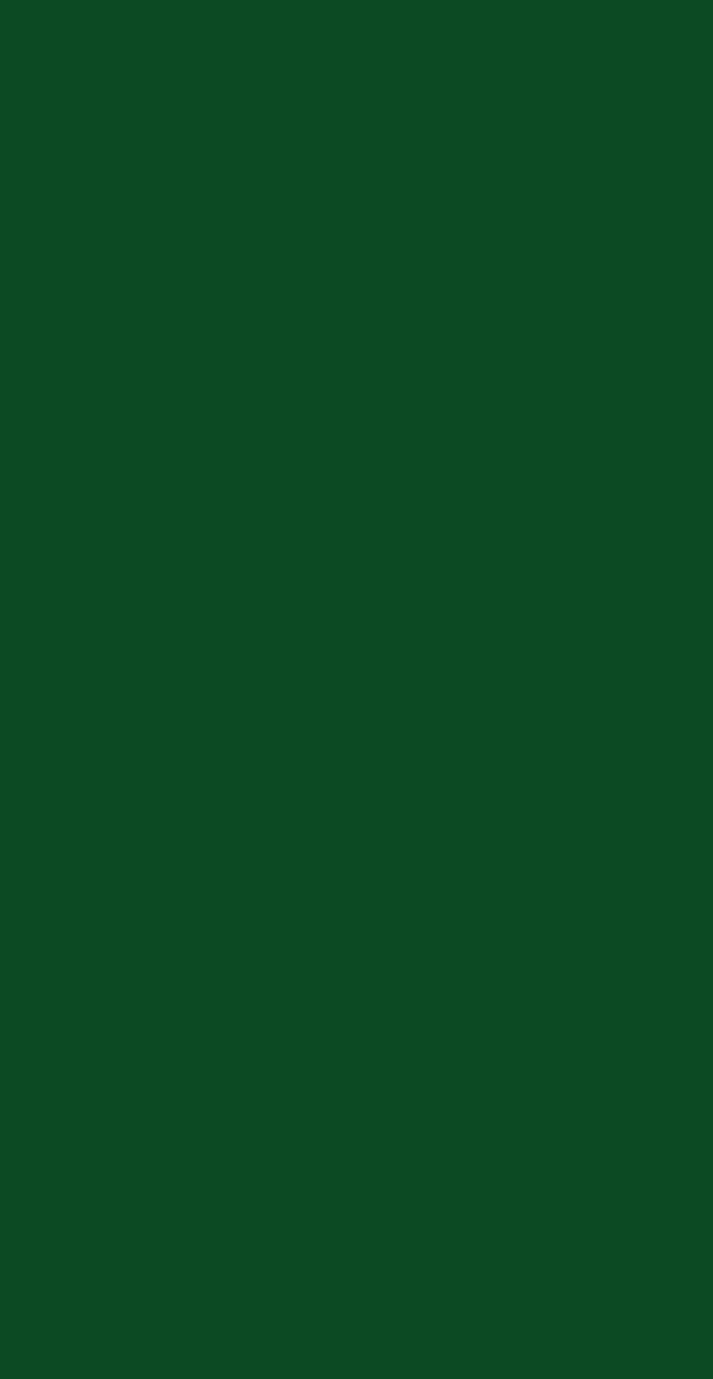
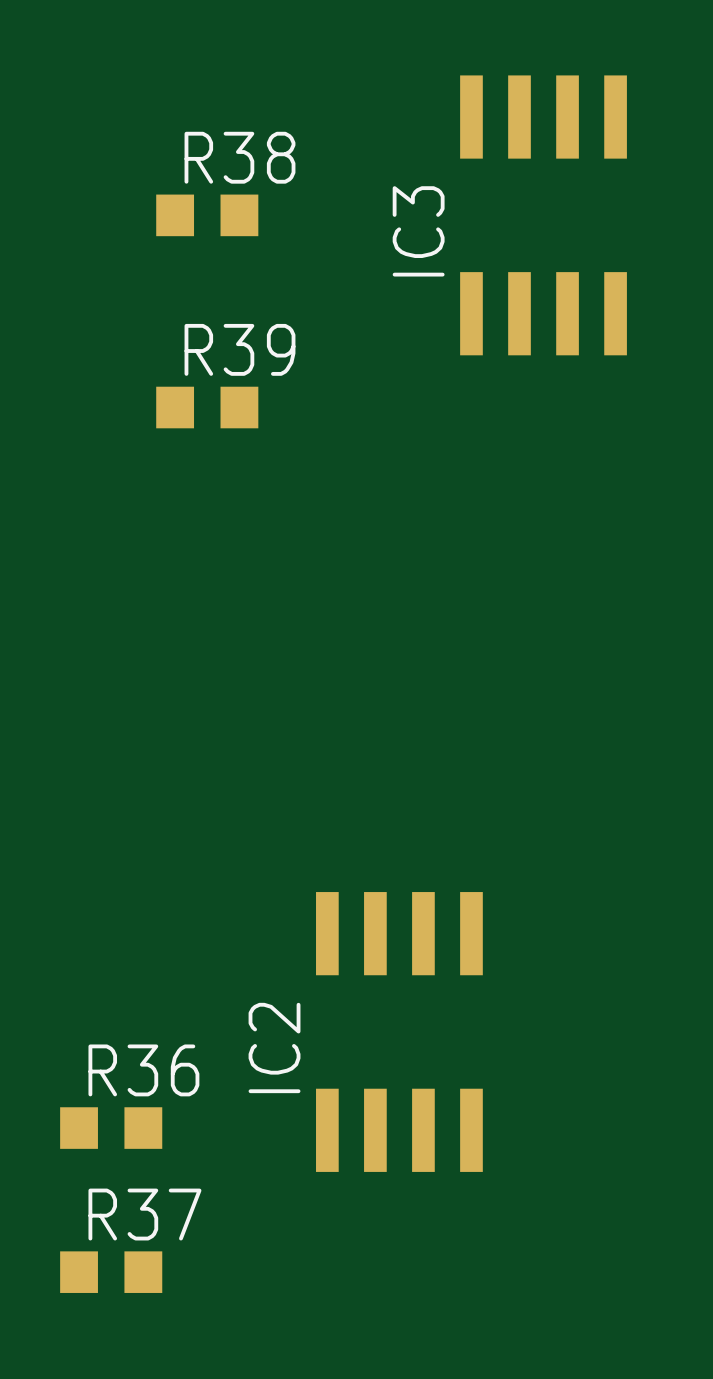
R38: none -> (207, 215)
IC3: none -> (543, 215)
R39: none -> (207, 407)
IC2: none -> (399, 1031)
R36: none -> (111, 1128)
R37: none -> (111, 1272)

